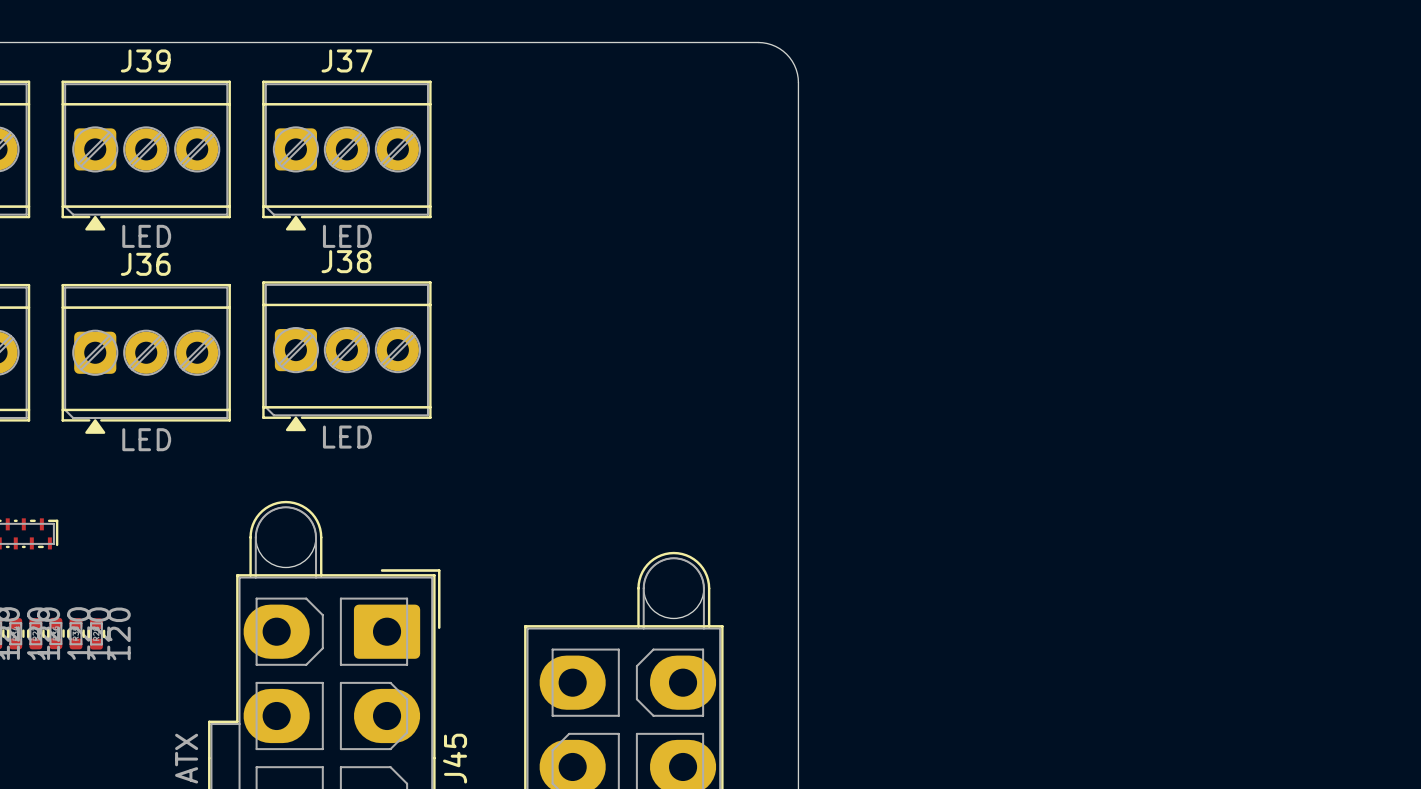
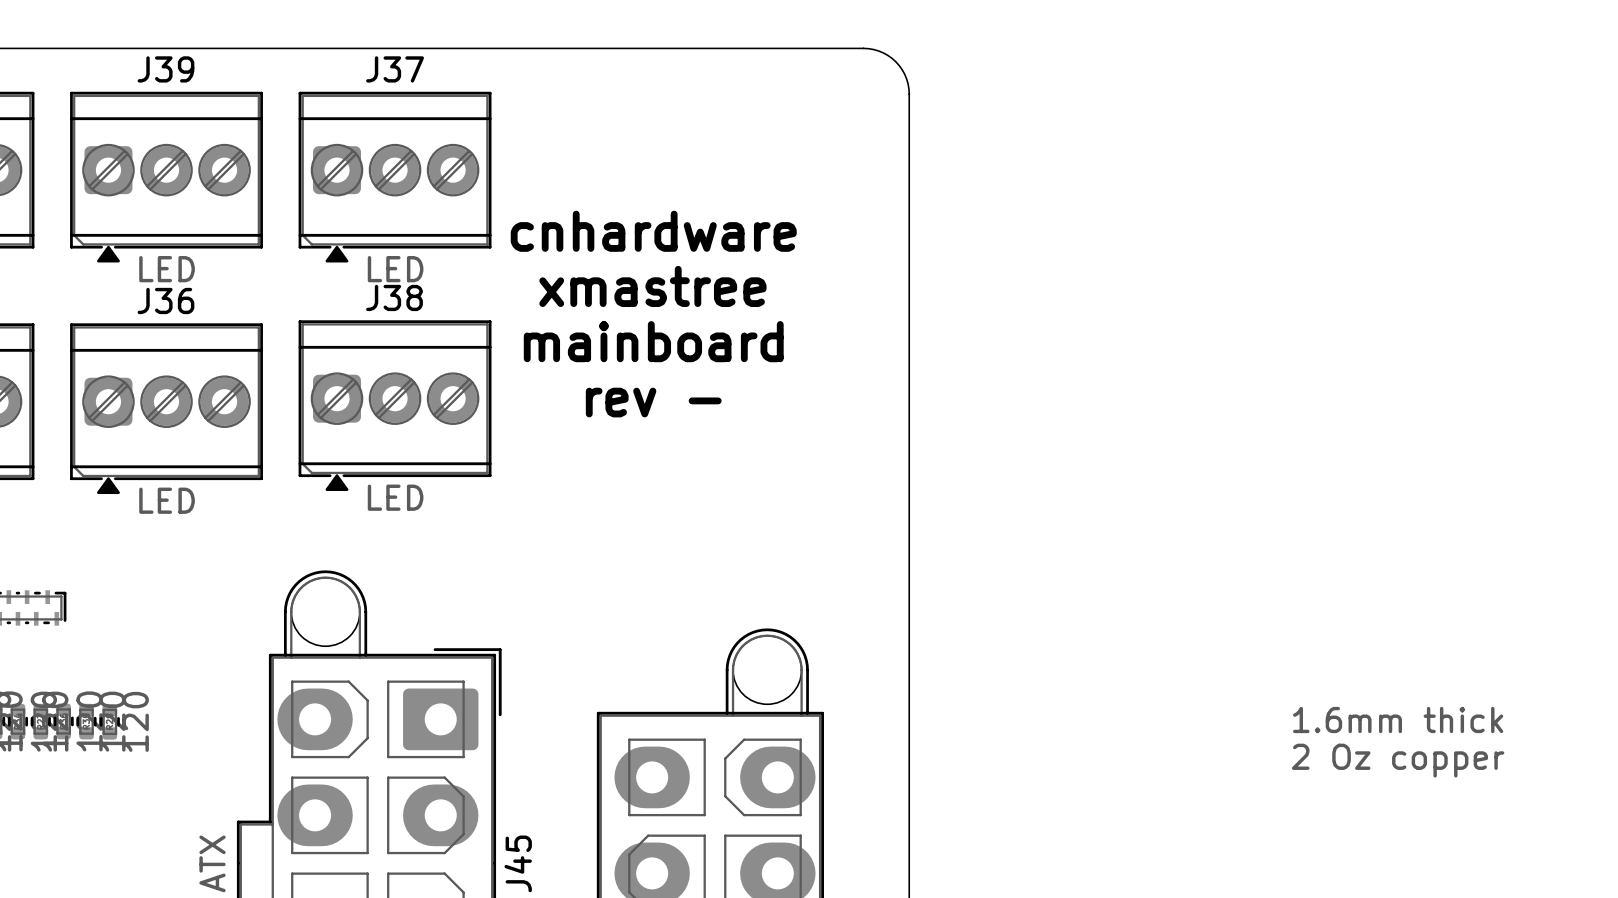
text: none -> cnhardware (653, 231)
text: none -> xmastree (652, 286)
text: none -> mainboard (653, 341)
text: none -> rev - (653, 402)
text: none -> 1.6mm thick (1398, 720)
text: none -> 2 Oz copper (1398, 760)

